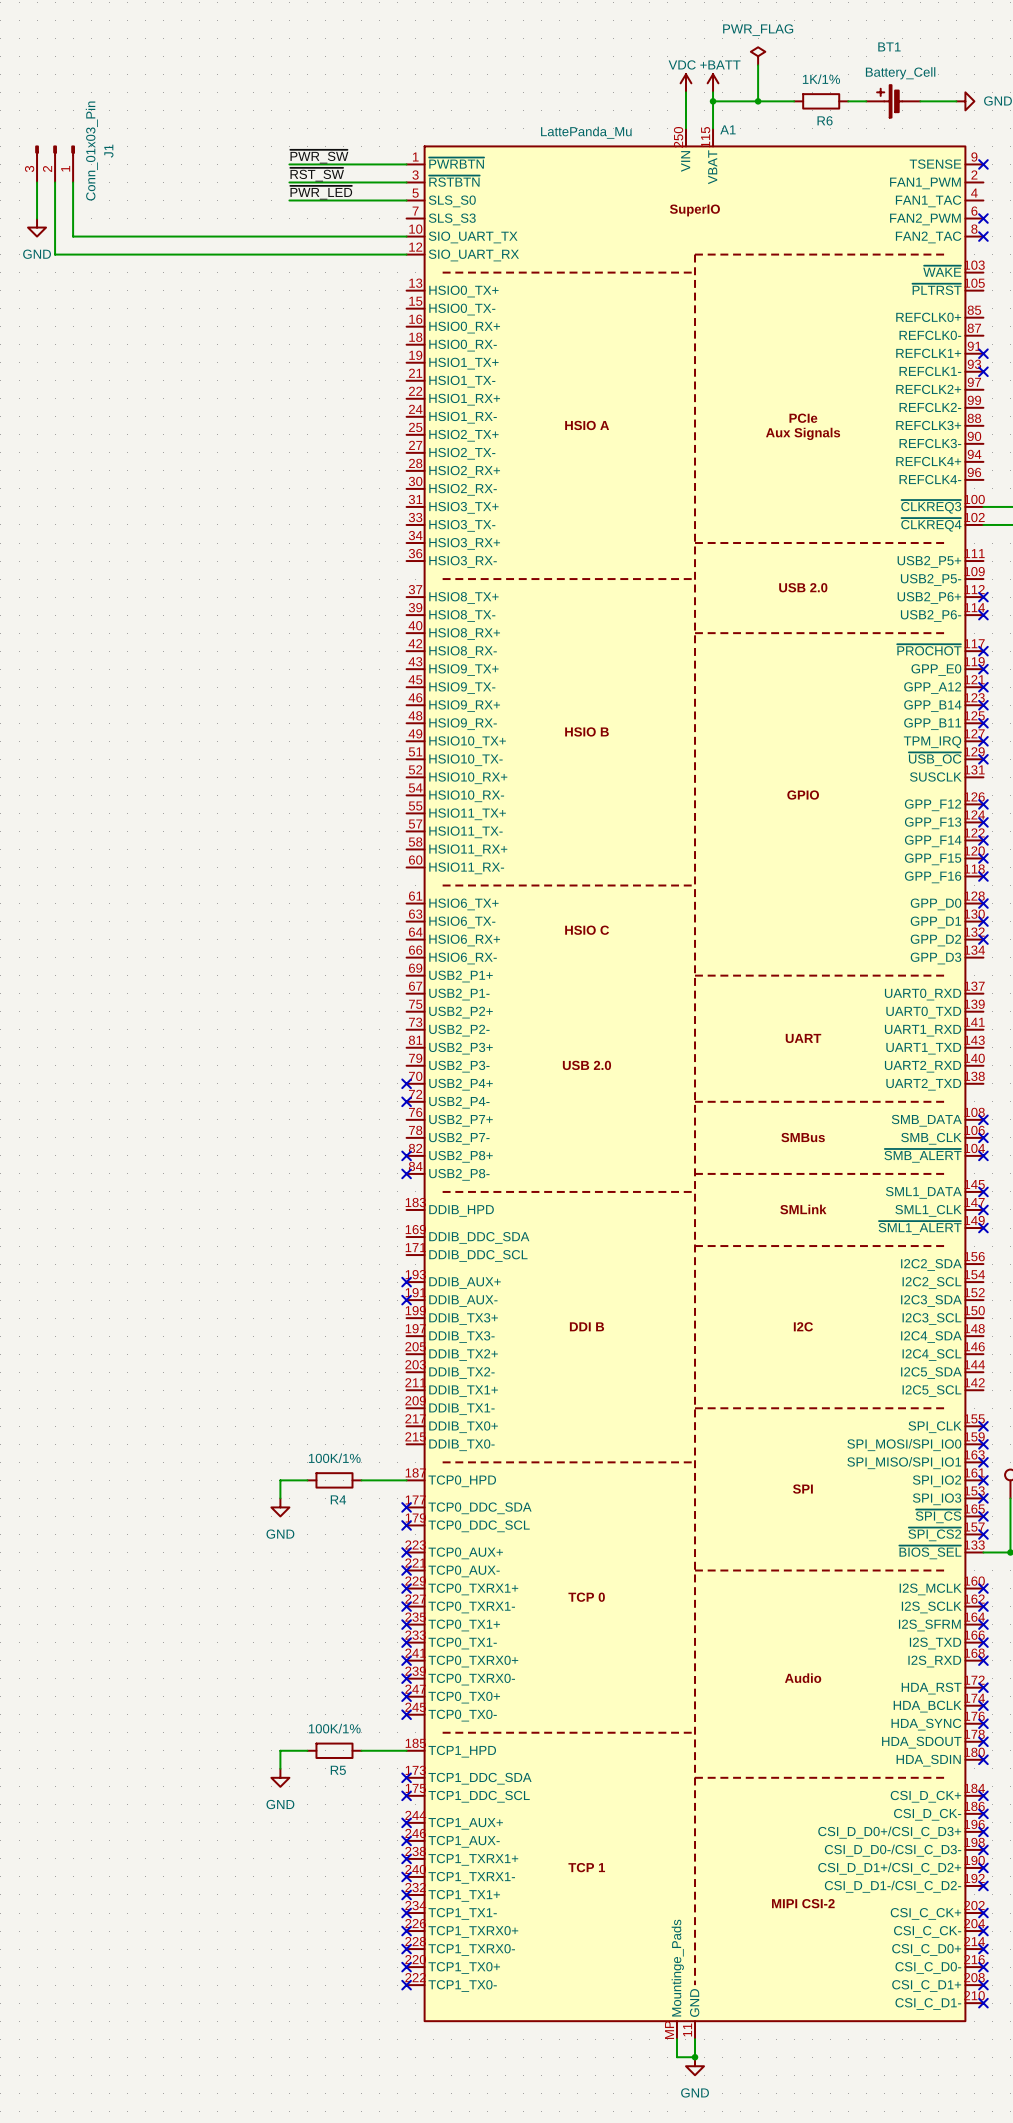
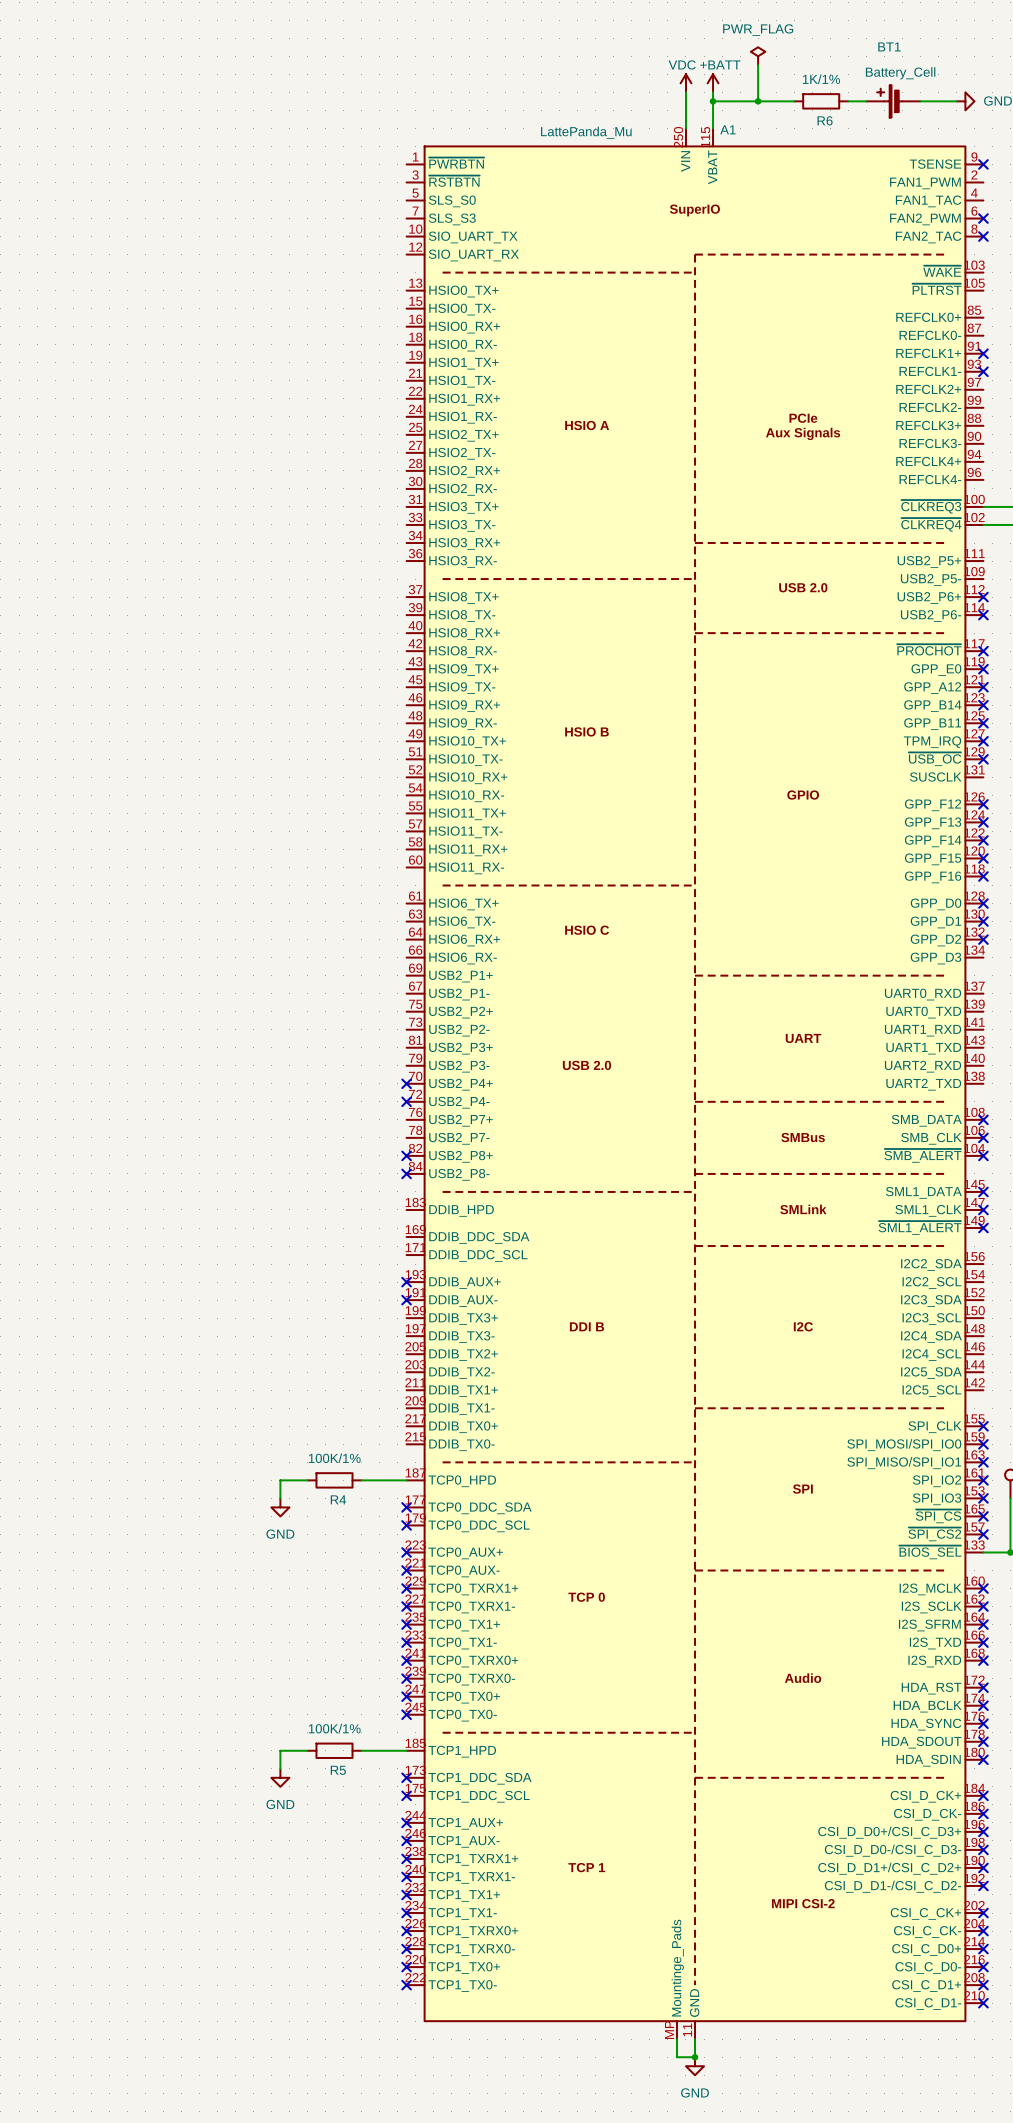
label: ~{PWR_SW} (319, 156) -> none
J1: Conn_01x03_Pin (55, 164) -> none
wire: (289, 164) (406, 164) -> none
label: ~{RST_SW} (317, 174) -> none
wire: (37, 182) (37, 218) -> none
wire: (55, 182) (55, 254) (406, 254) -> none
wire: (73, 182) (73, 236) (406, 236) -> none
wire: (289, 182) (406, 182) -> none
label: ~{PWR_LED} (321, 192) -> none
wire: (289, 200) (406, 200) -> none
power symbol: GND (37, 227) -> none

